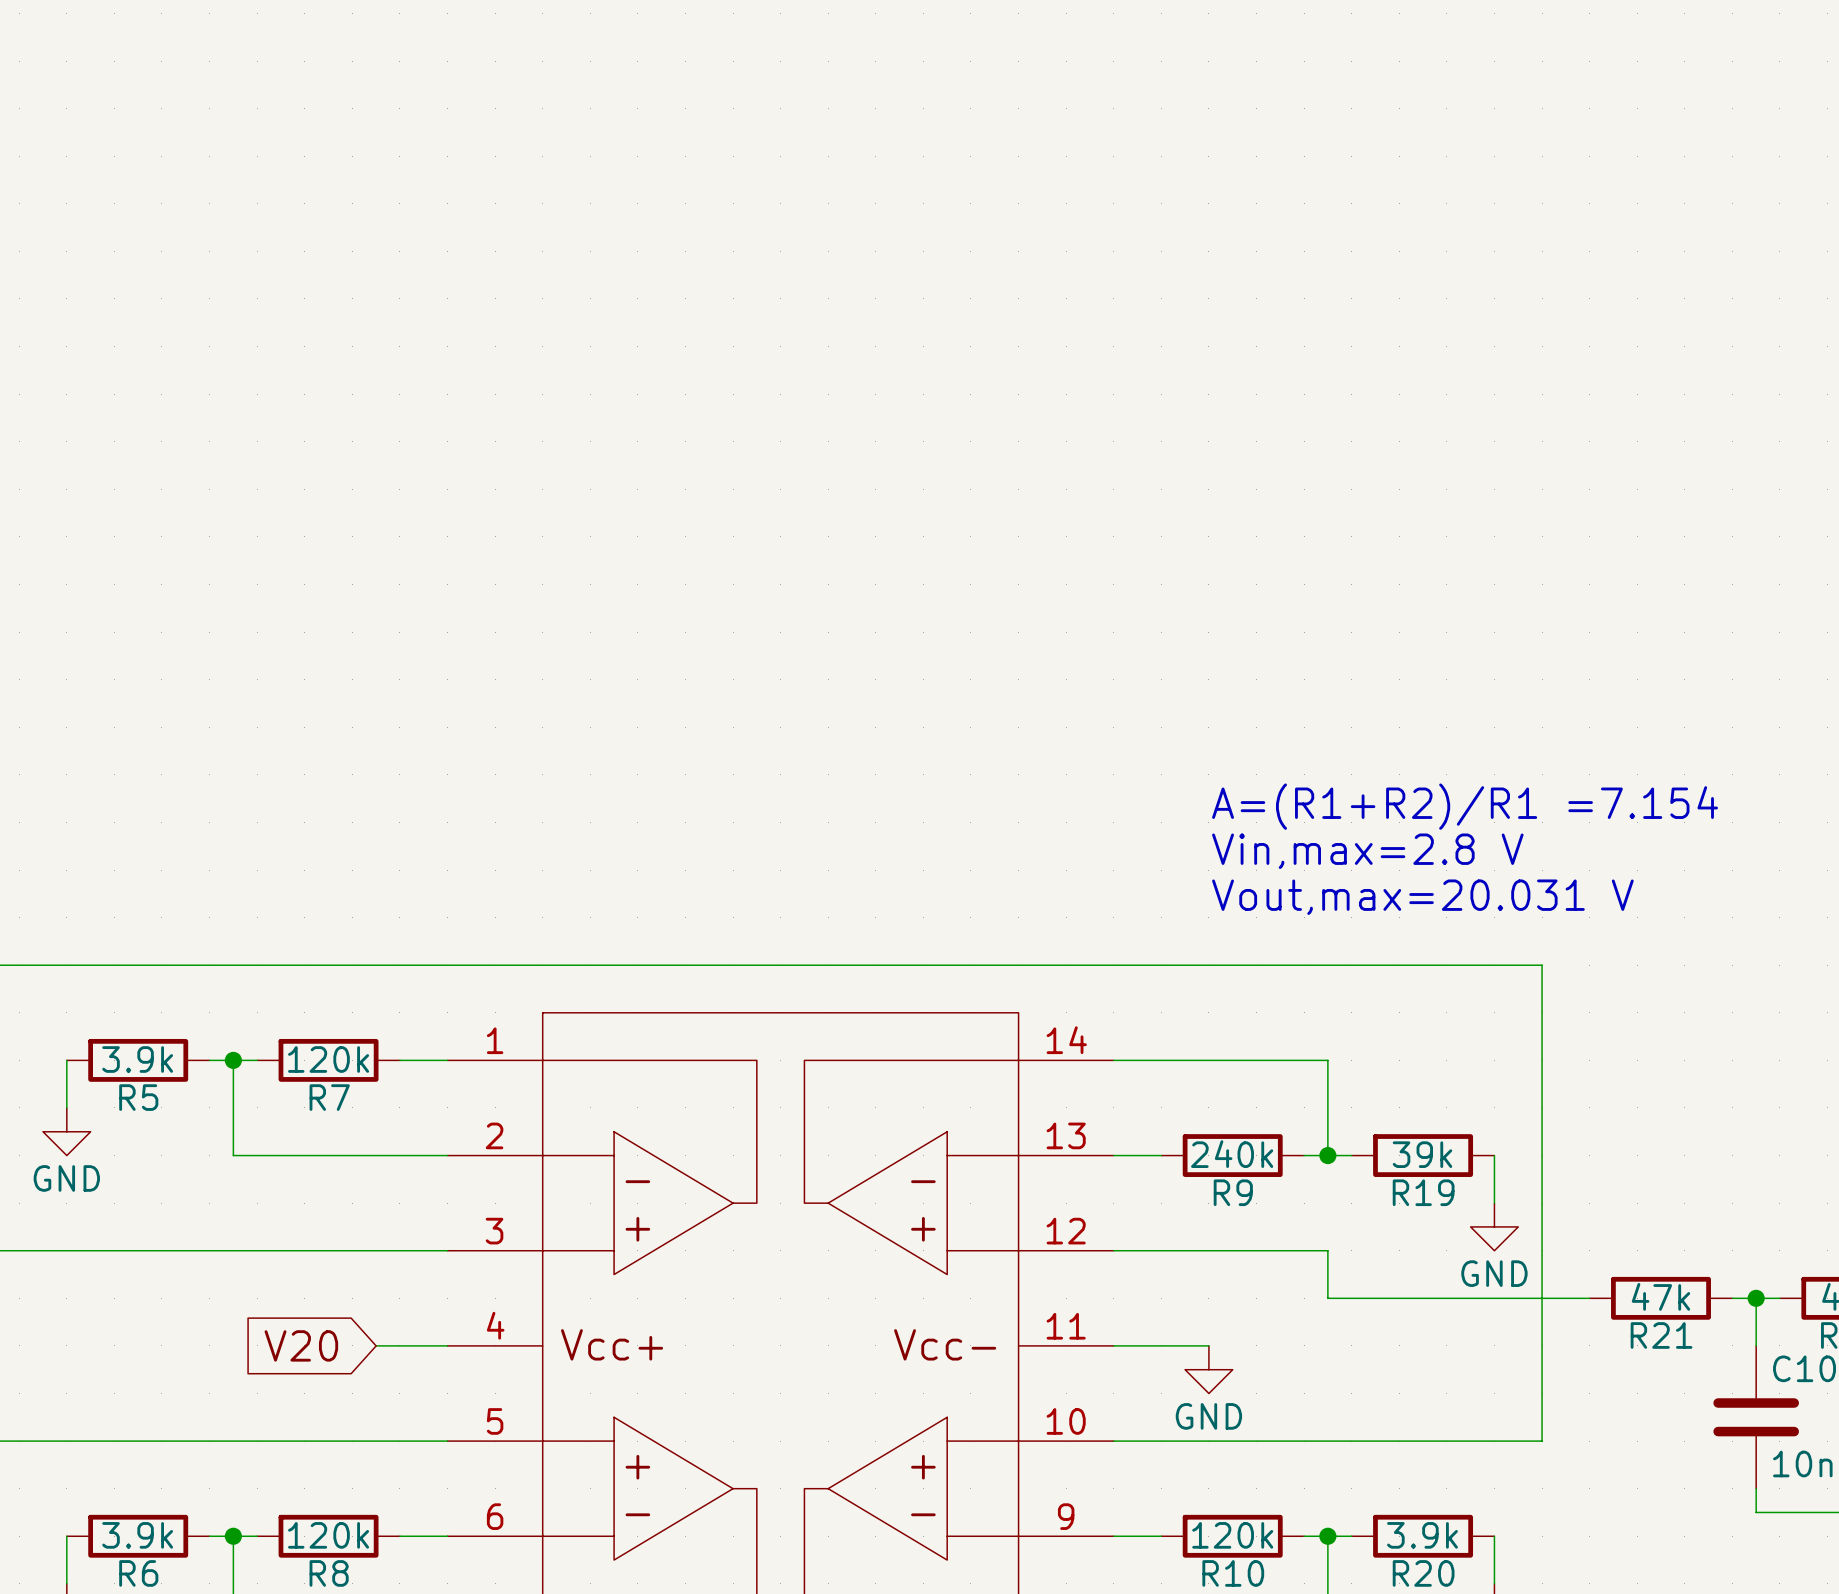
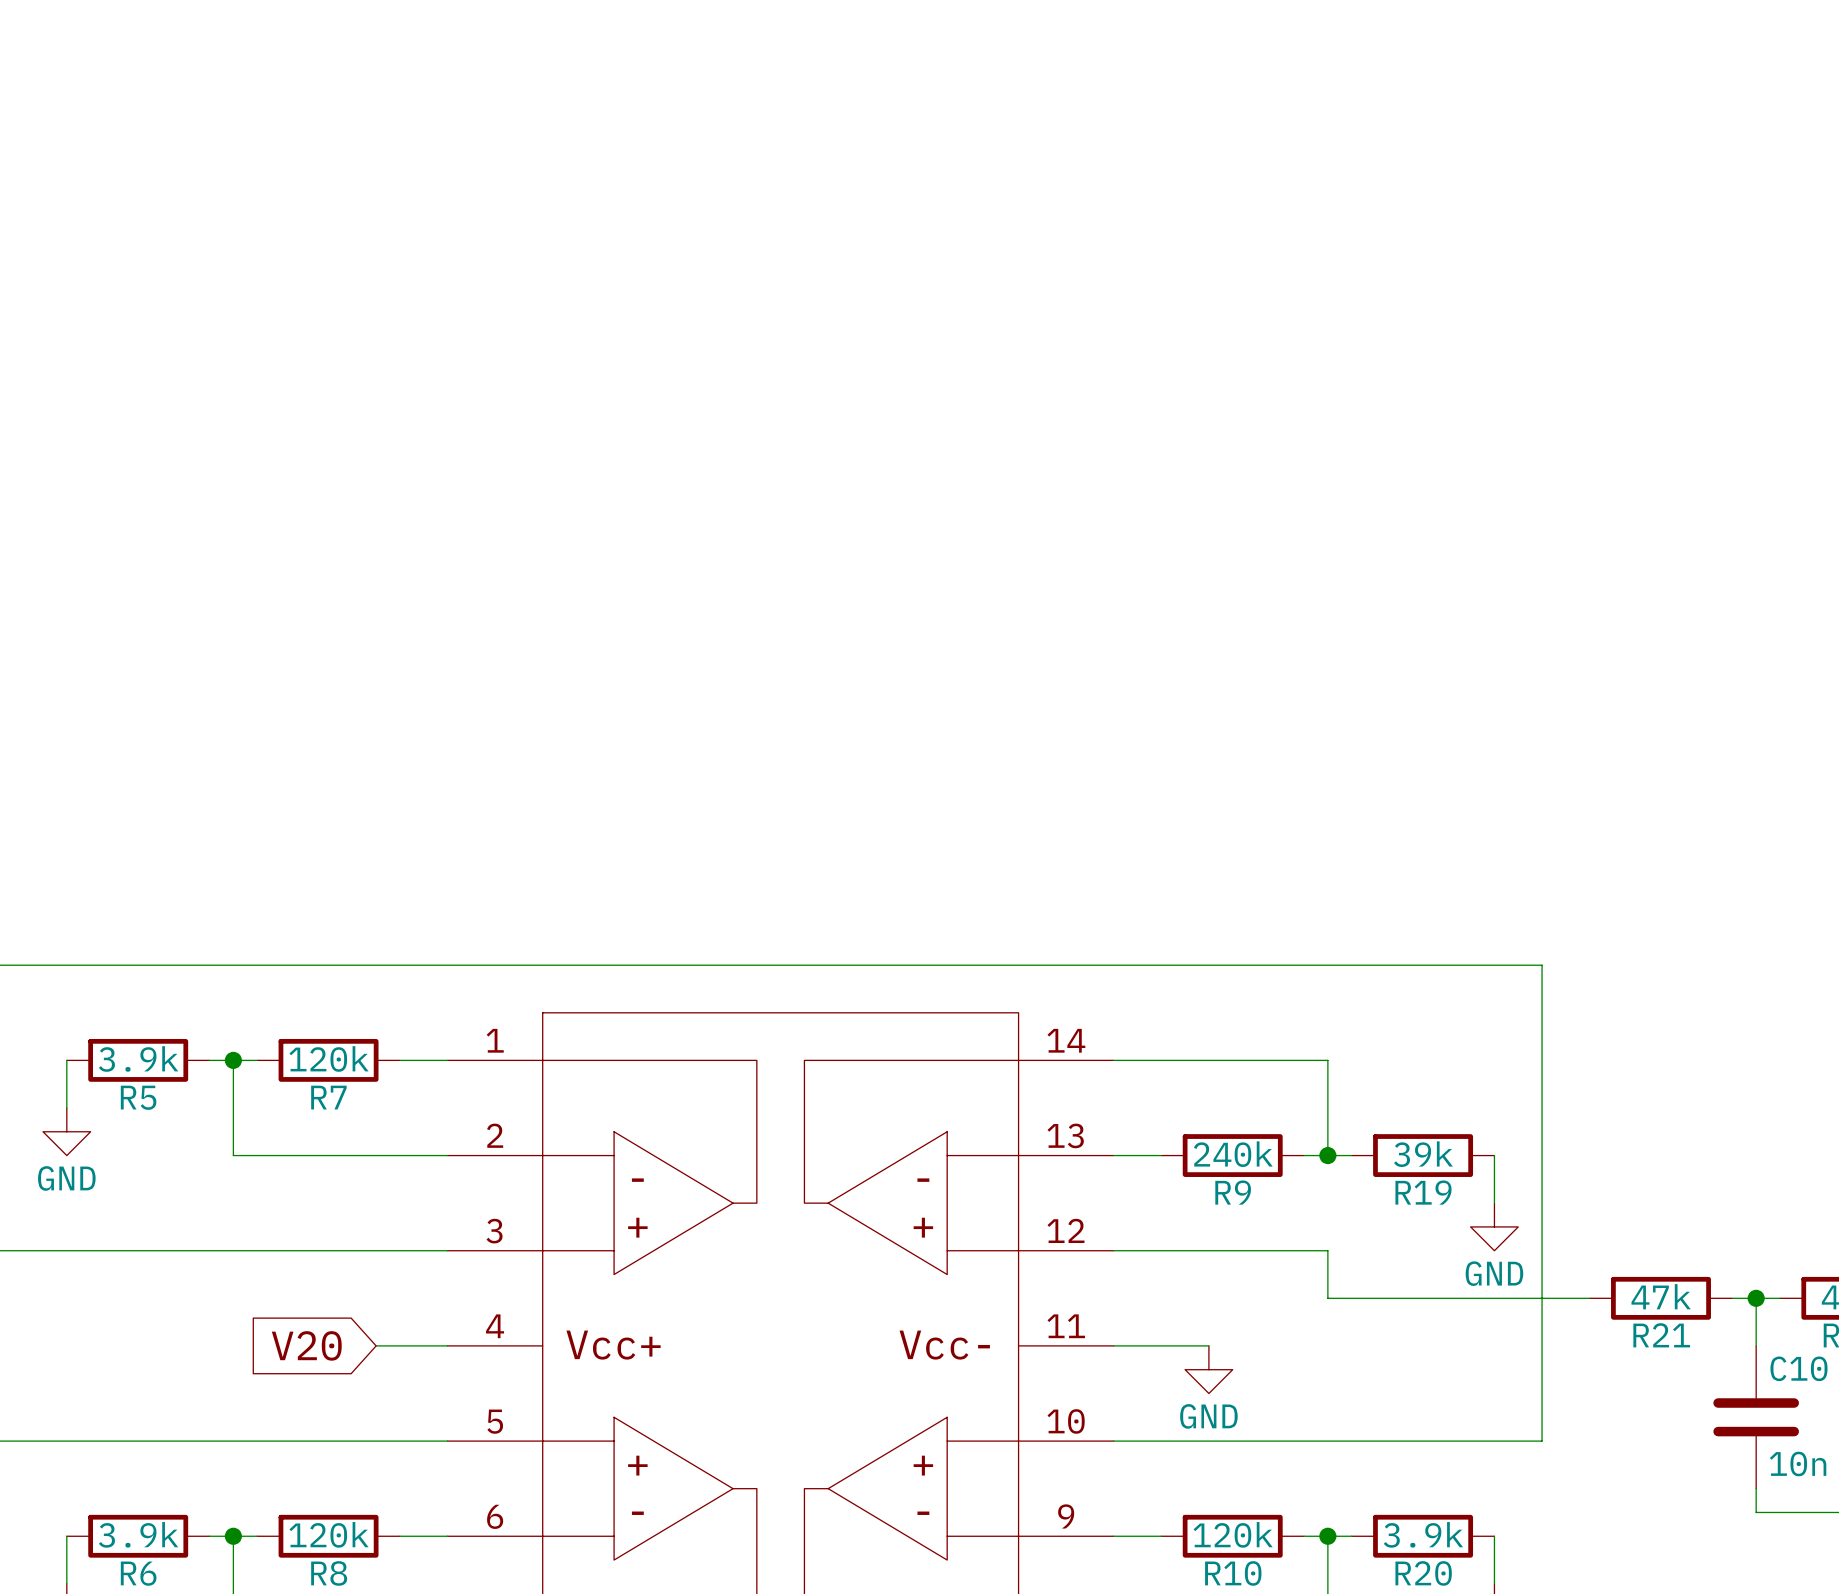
text: A=(R1+R2)/R1 =7.154 (1465, 806) -> none
text: Vin,max=2.8 V (1367, 851) -> none
text: Vout,max=20.031 V (1422, 897) -> none

